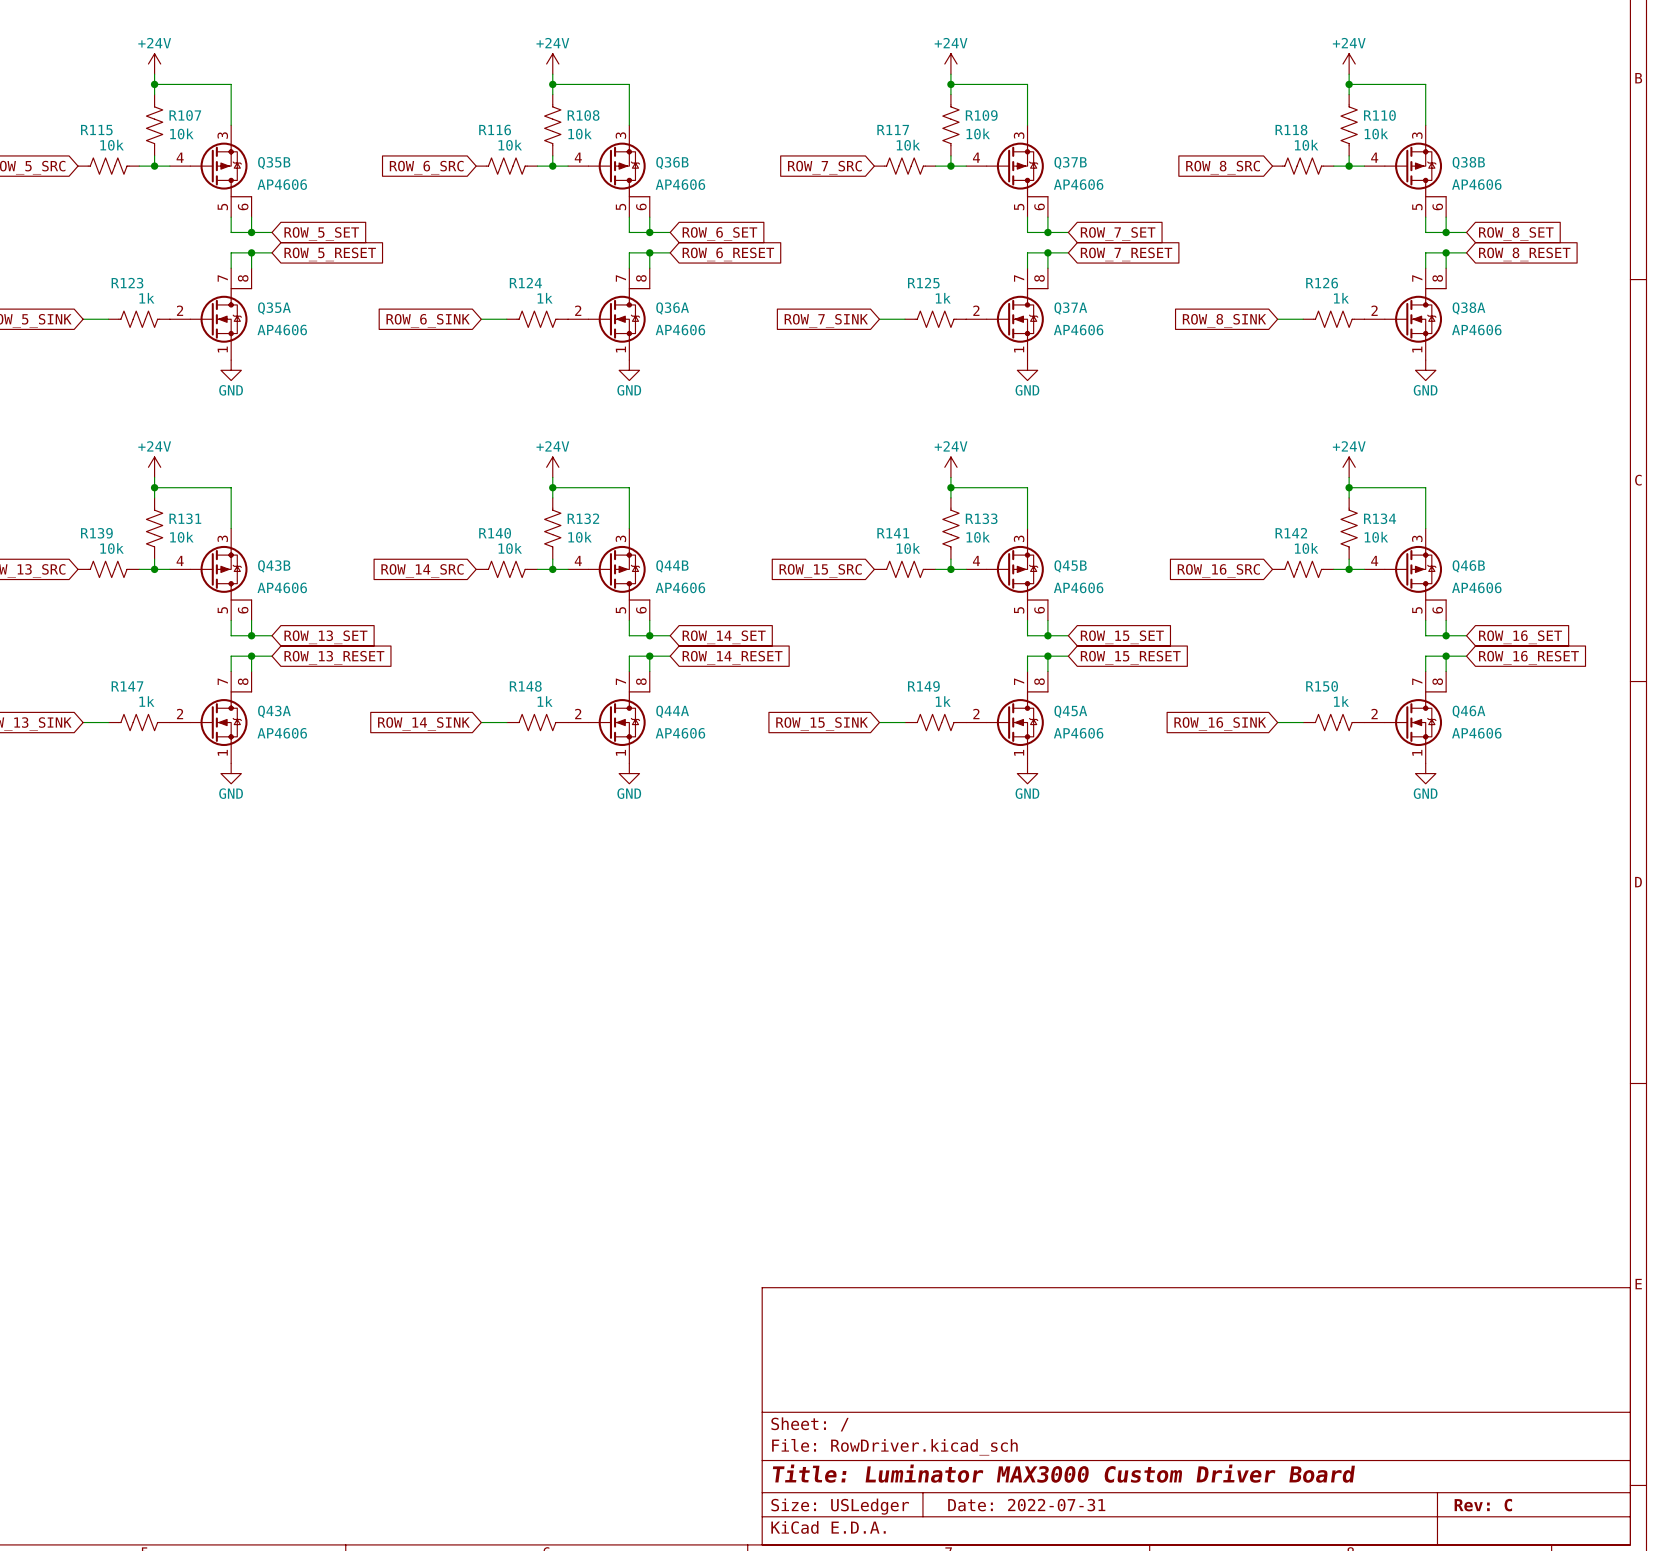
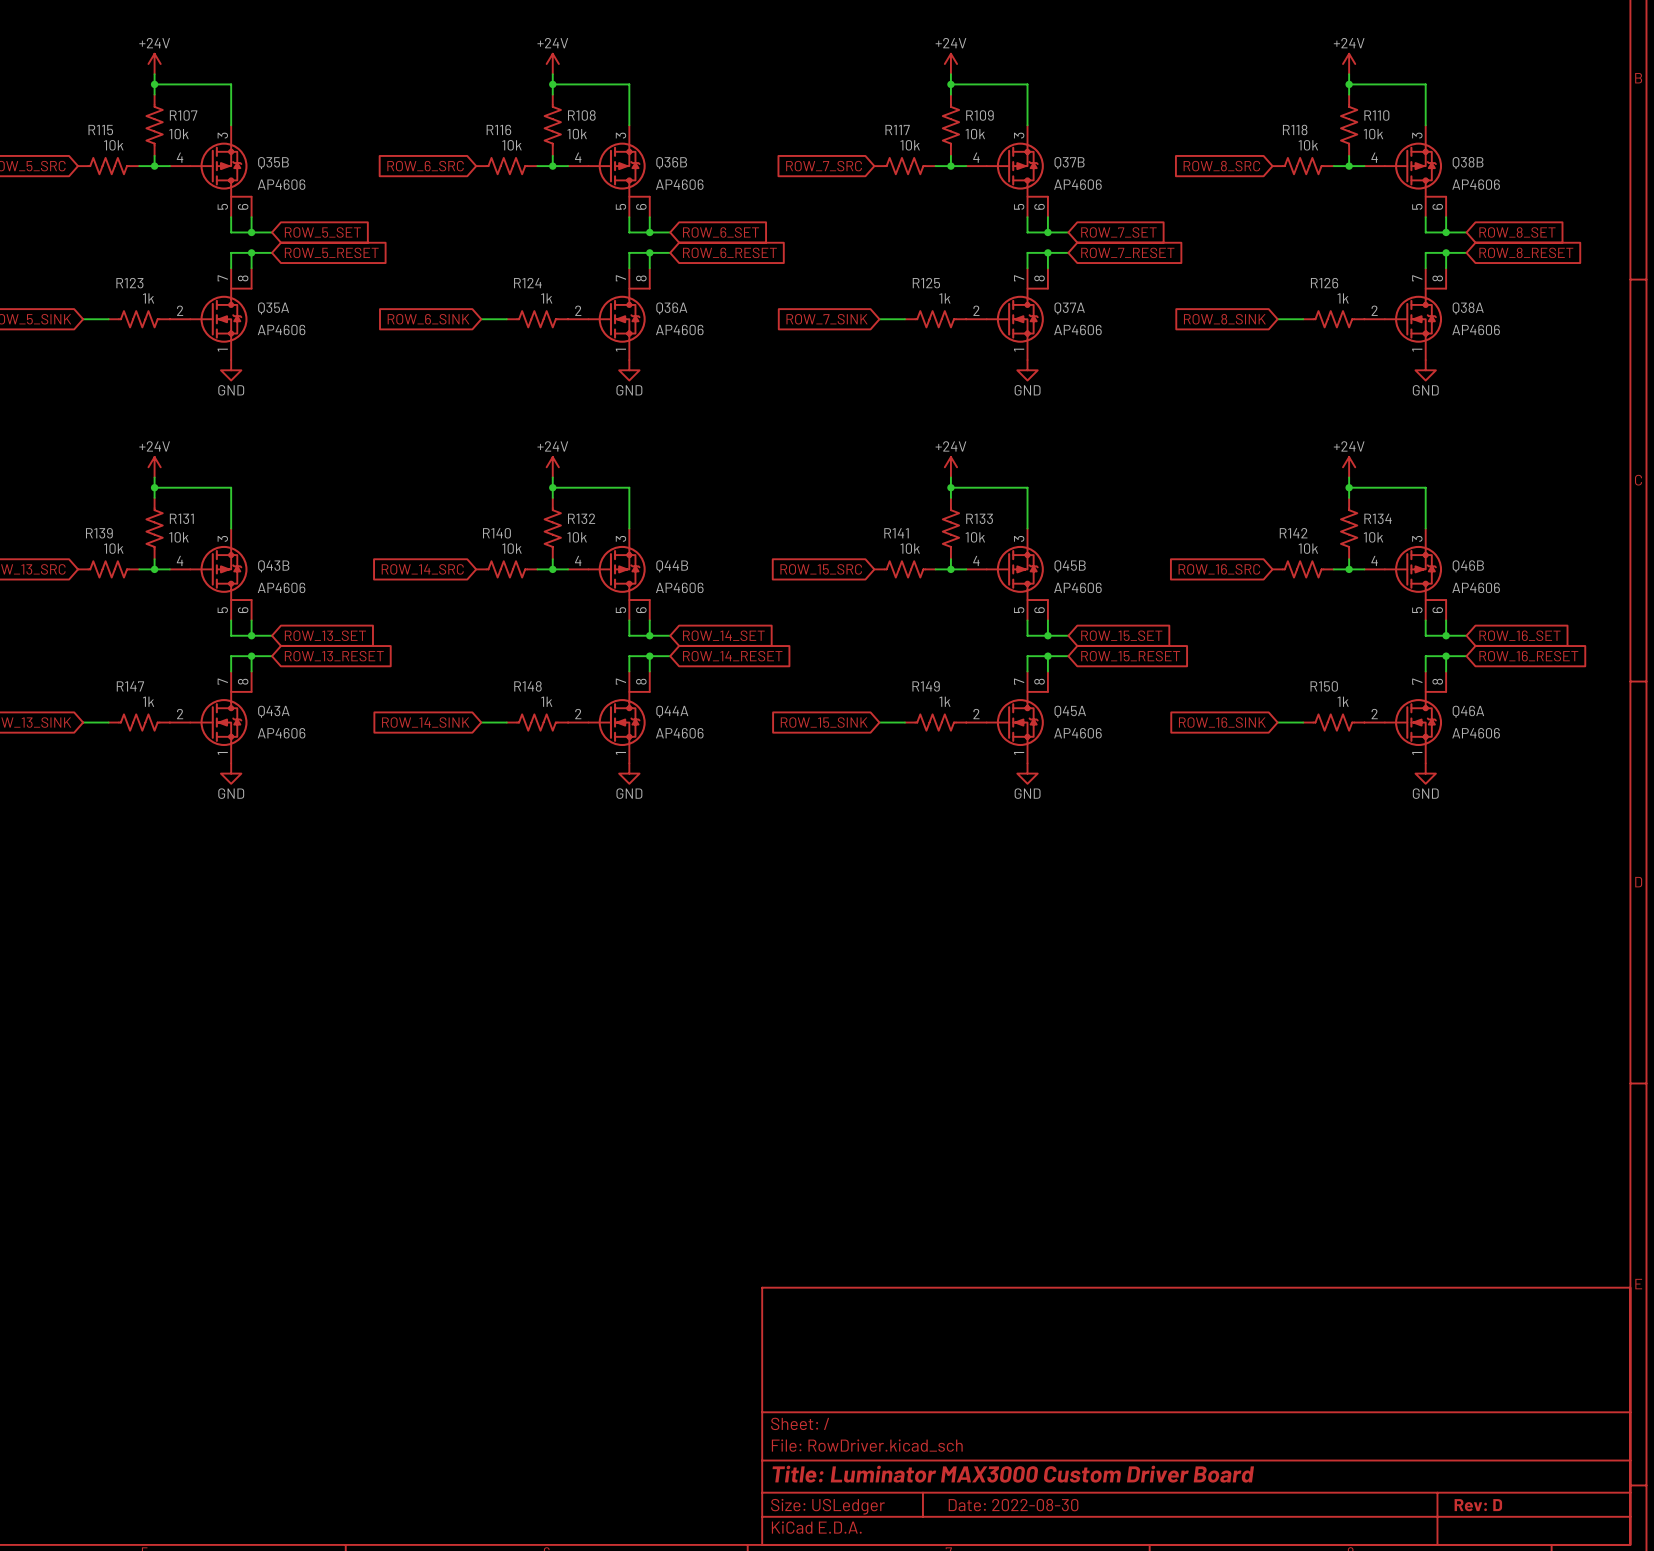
title block: Date: 2022-07-31 (1026, 1505) -> Date: 2022-08-30 (1013, 1505)
title block: Rev: C (1483, 1505) -> Rev: D (1478, 1505)

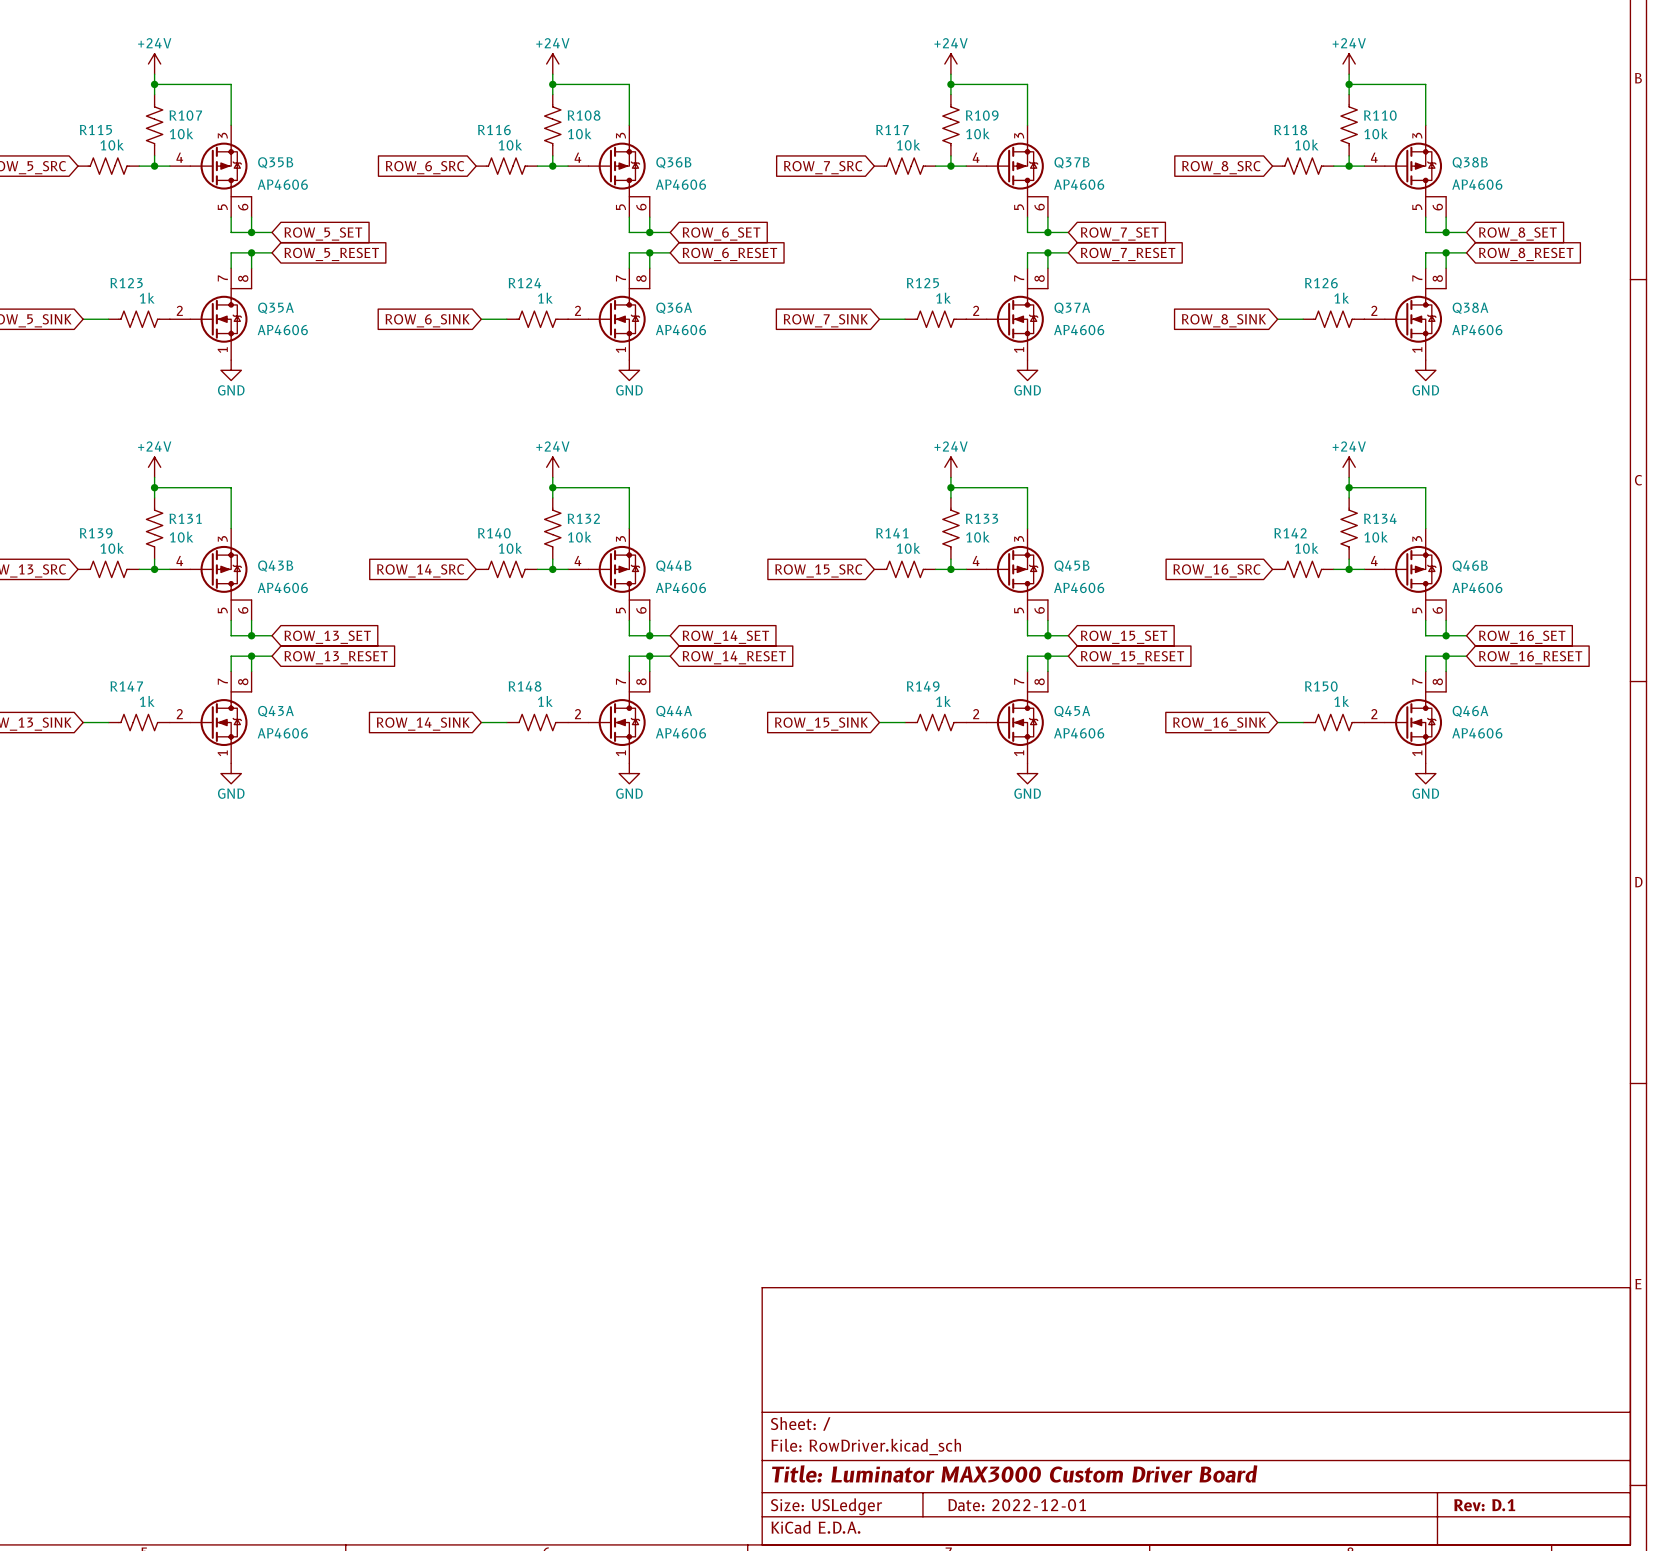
title block: Date: 2022-08-30 (1013, 1505) -> Date: 2022-12-01 (1017, 1505)
title block: Rev: D (1478, 1505) -> Rev: D.1 (1484, 1505)

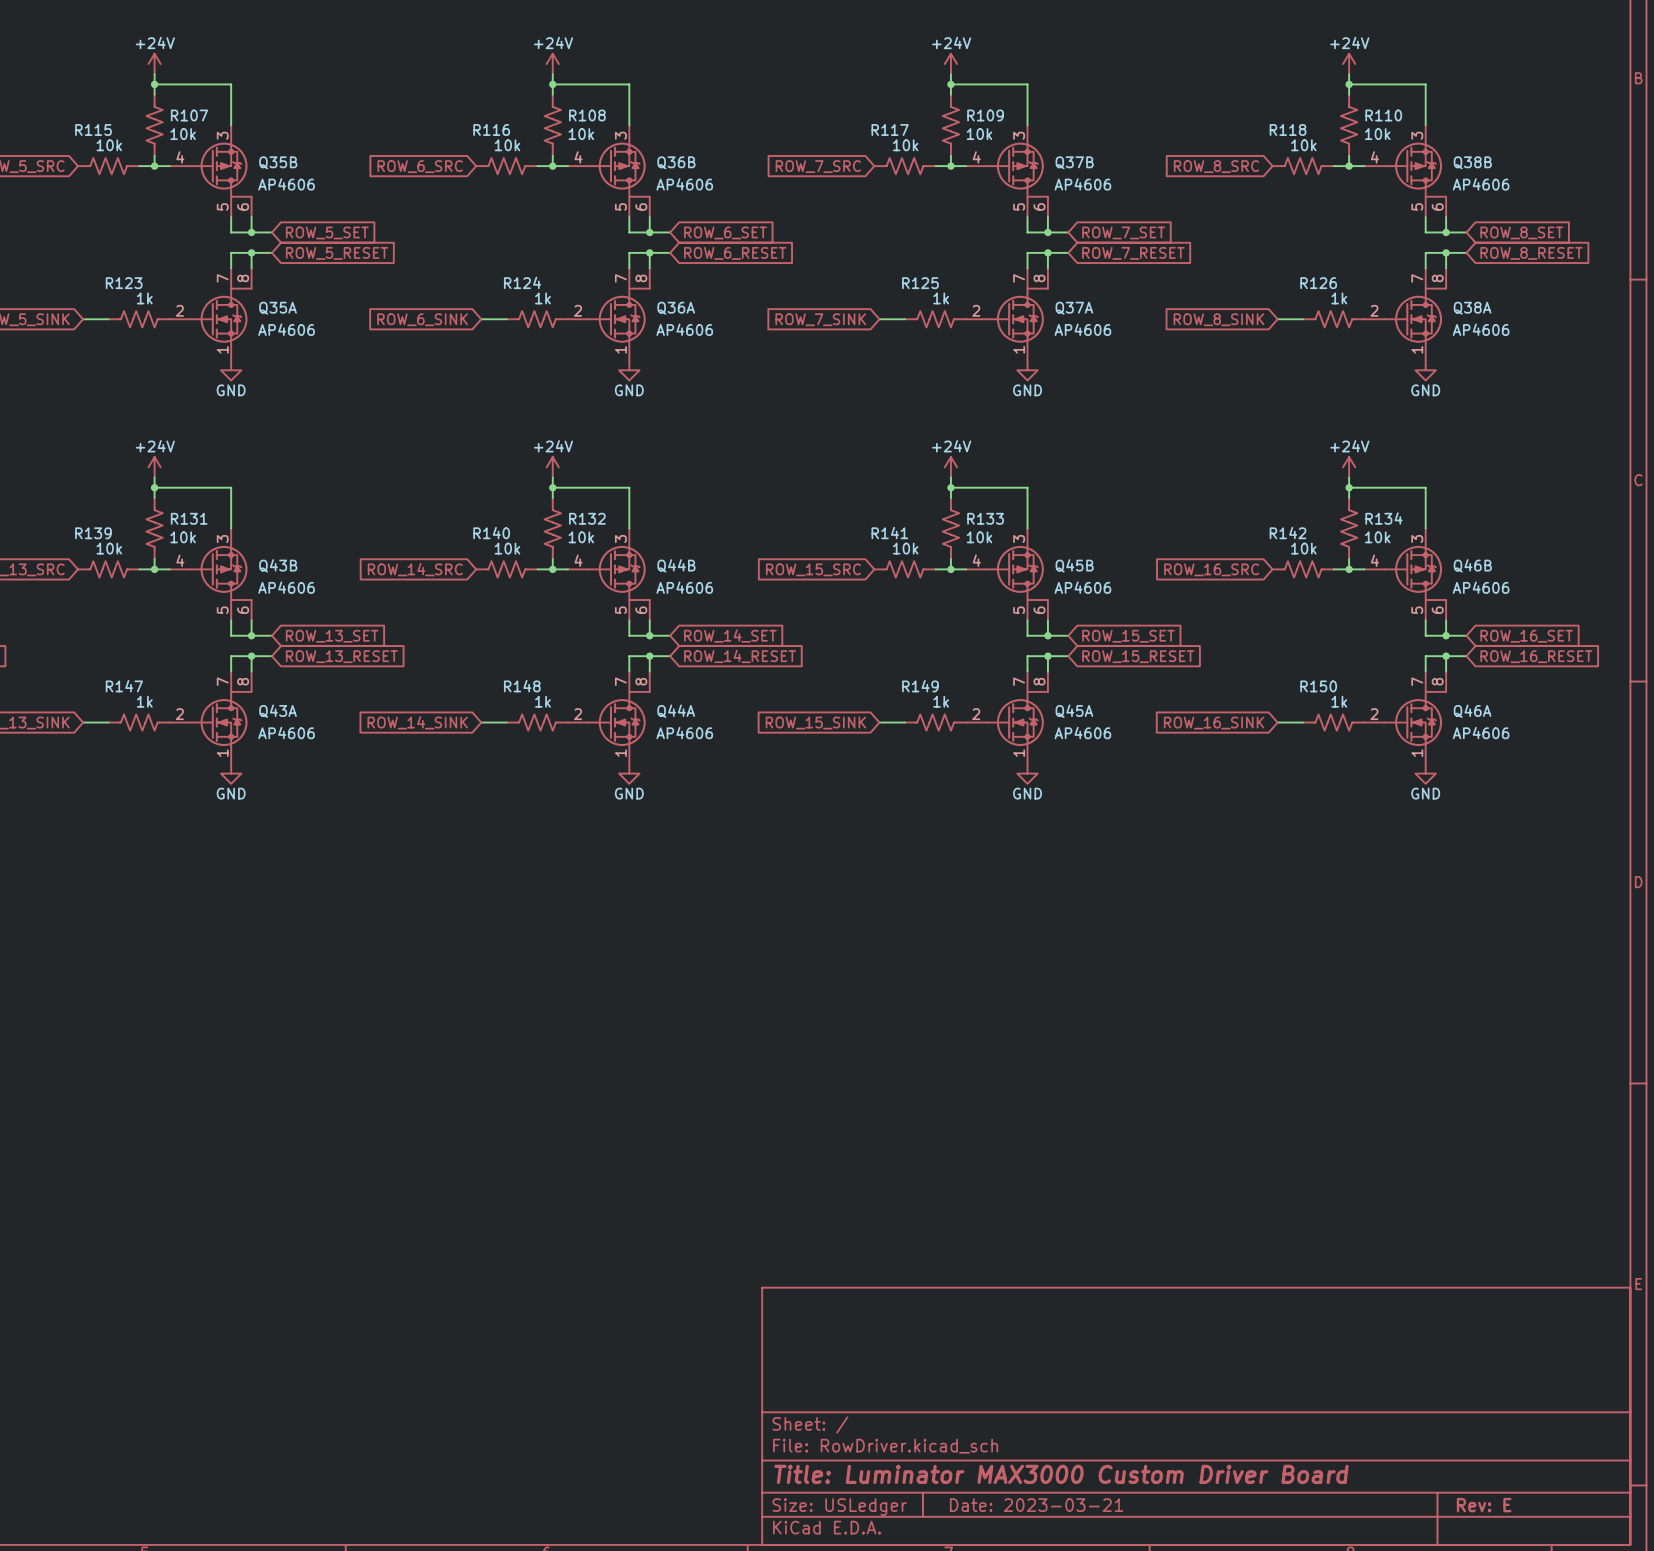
title block: Date: 2022-12-01 (1017, 1505) -> Date: 2023-03-21 (1036, 1505)
title block: Rev: D.1 (1484, 1505) -> Rev: E (1484, 1505)

